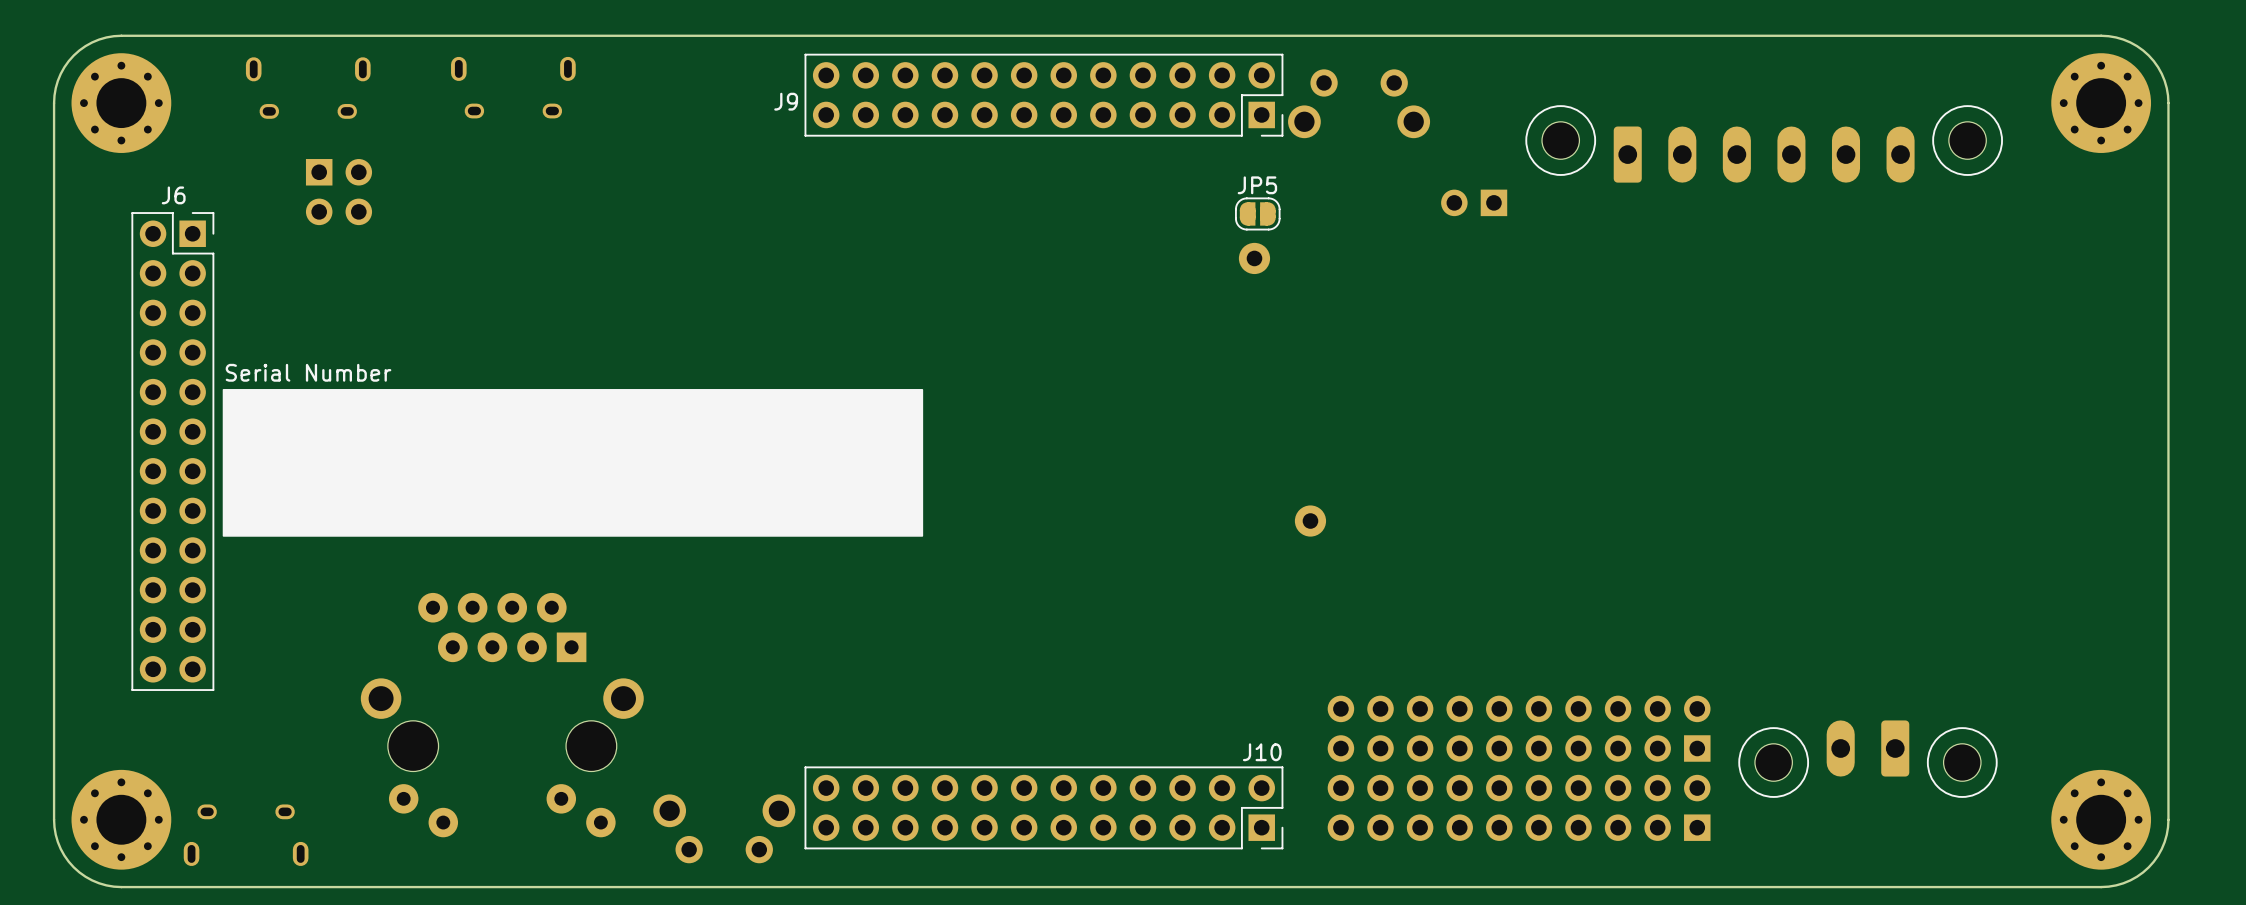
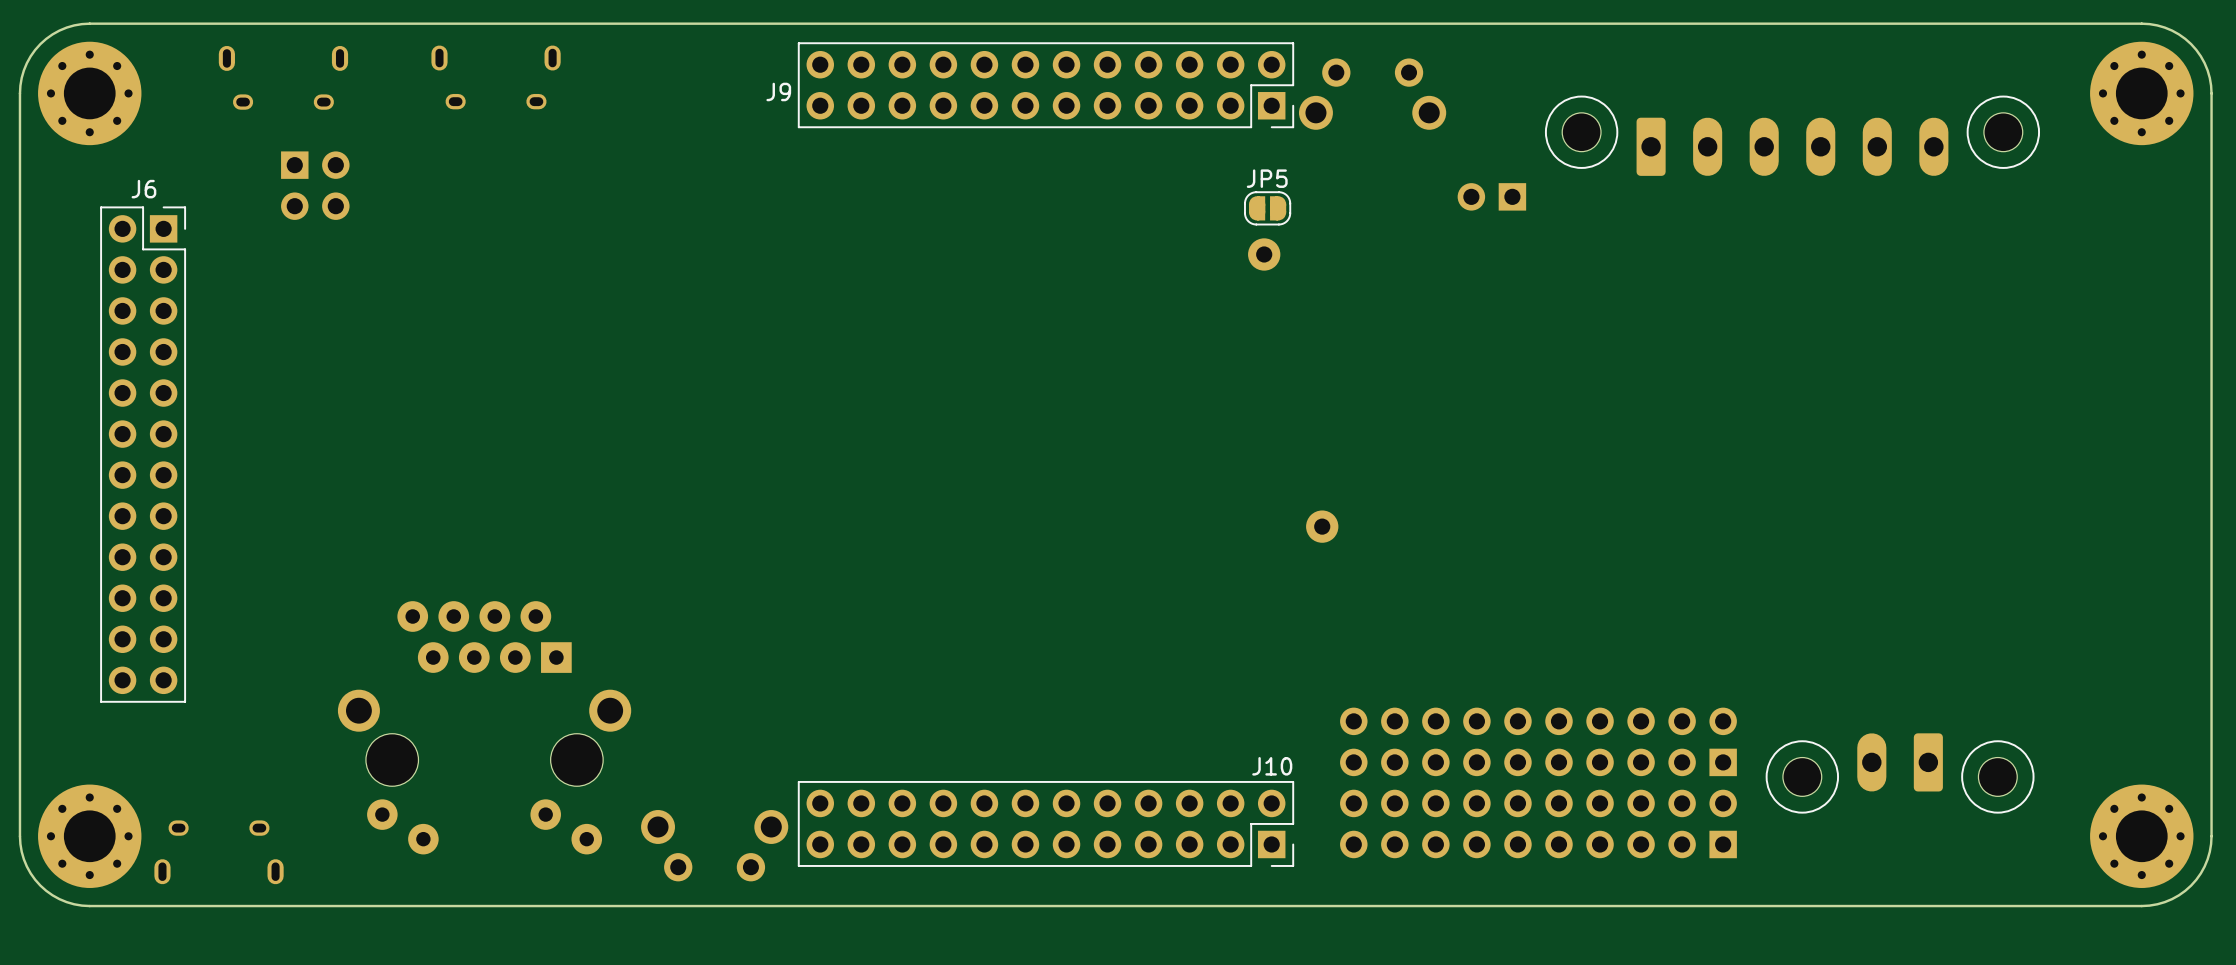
text: Serial Number (308, 372) -> none
drawing: [222, 389, 924, 537] -> none

